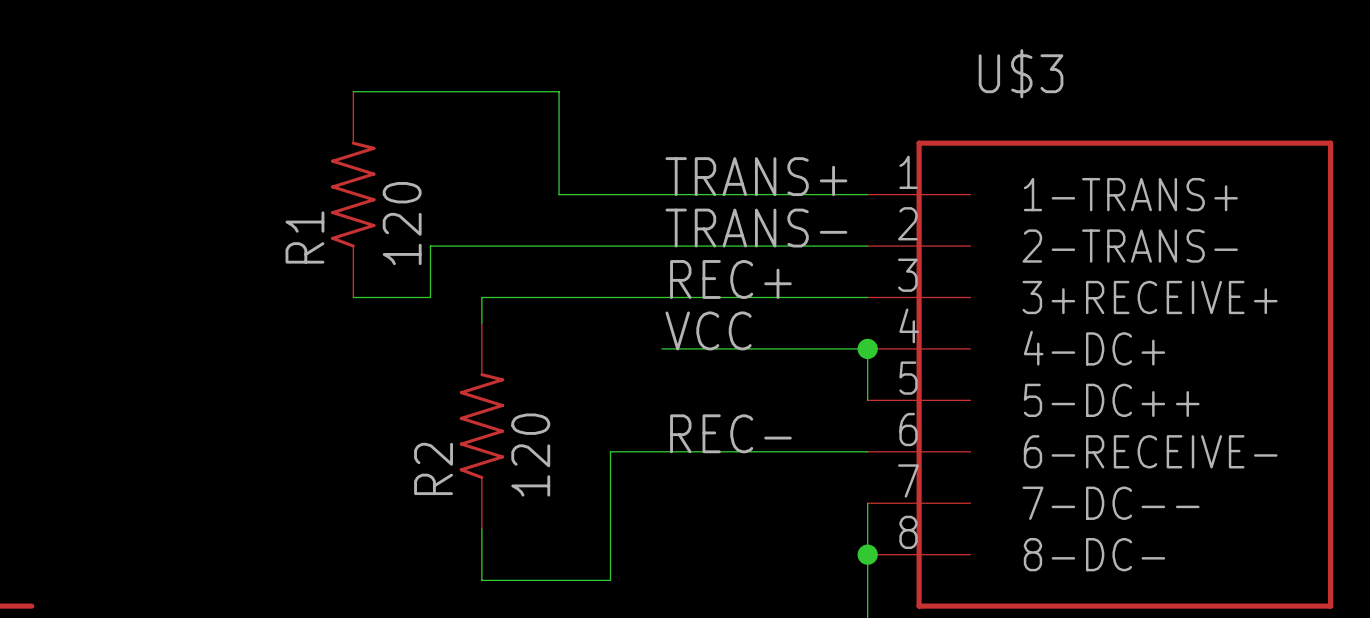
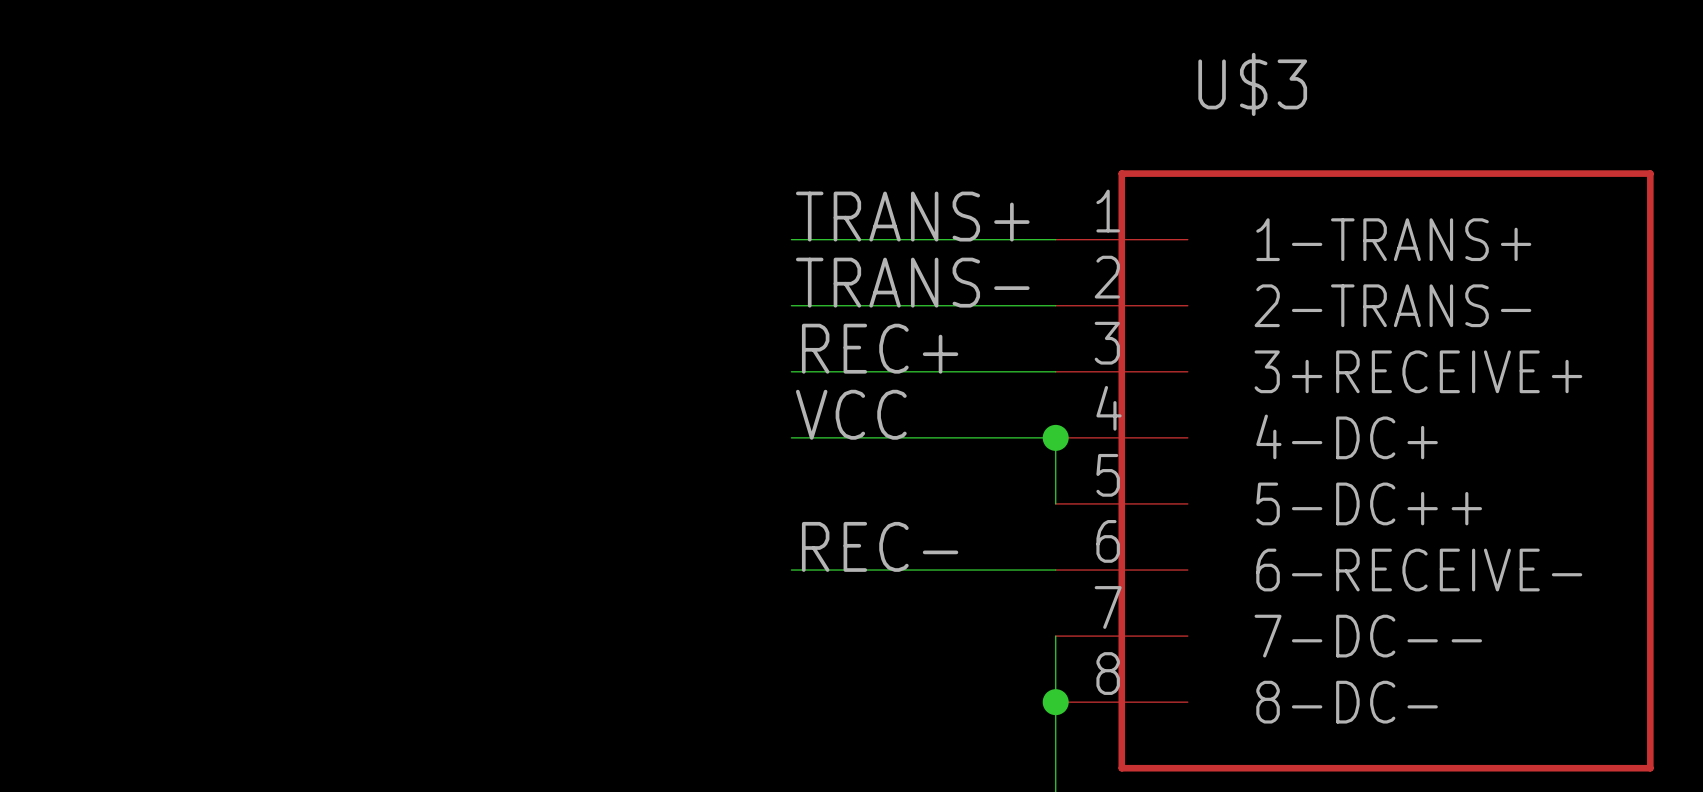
wire: (353, 91) (559, 91) (559, 194) (661, 194) -> none
R1: 120 (353, 194) -> none
wire: (661, 246) (430, 246) (430, 297) (353, 297) -> none
wire: (661, 297) (481, 297) (481, 323) -> none
R2: 120 (481, 426) -> none
wire: (661, 451) (610, 451) (610, 580) (481, 580) (481, 528) -> none

